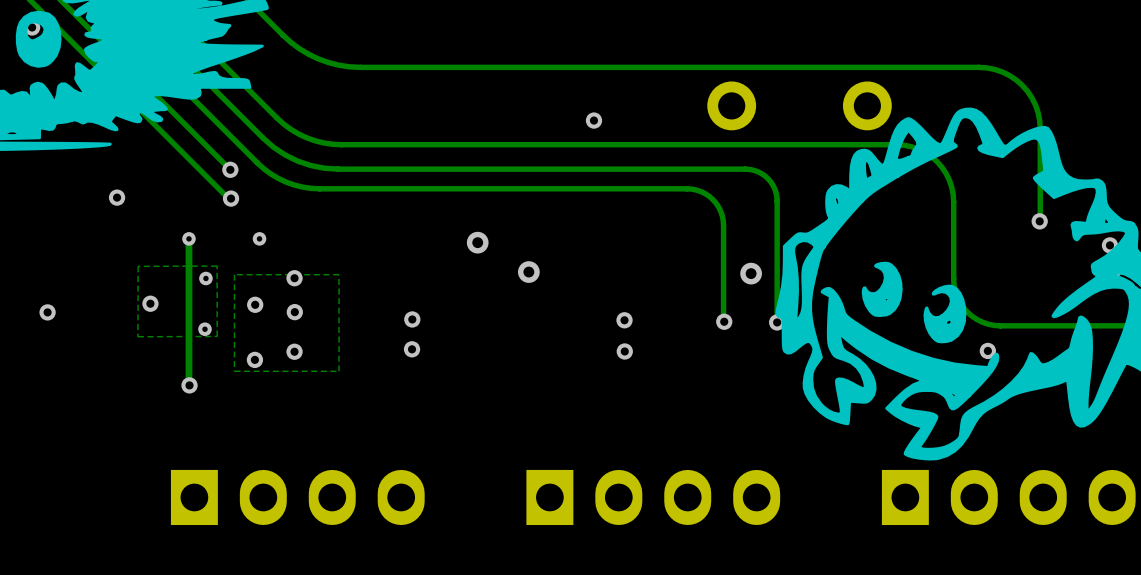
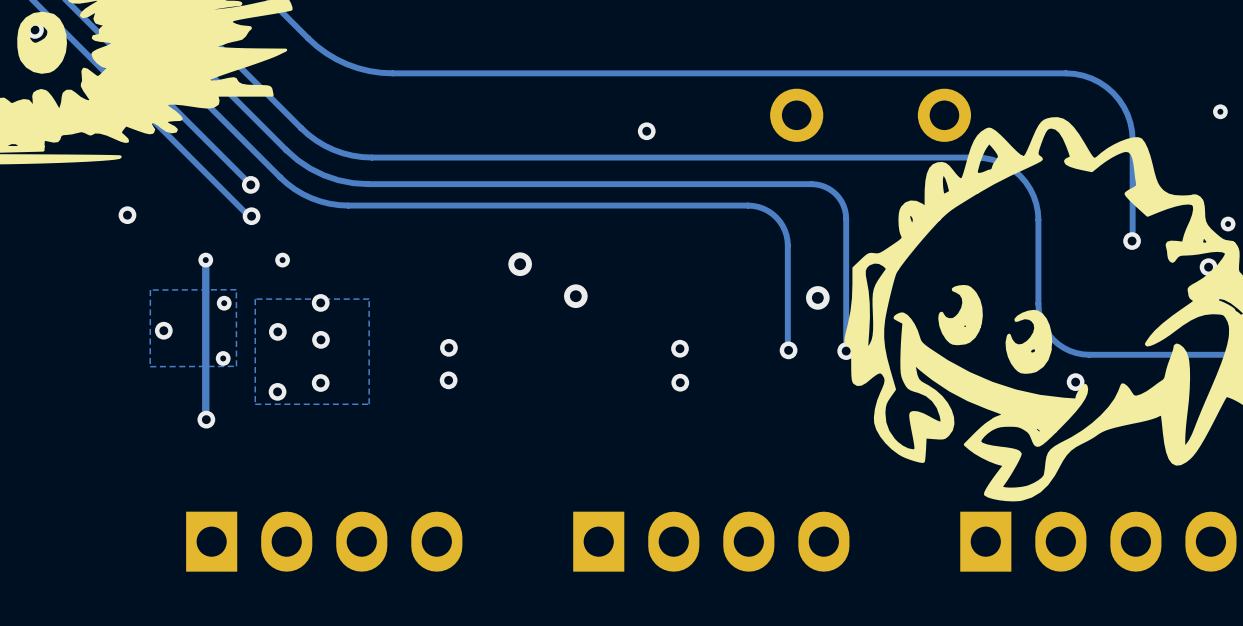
via: none -> (1220, 111)
via: none -> (1228, 224)
via: (47, 312) -> none

